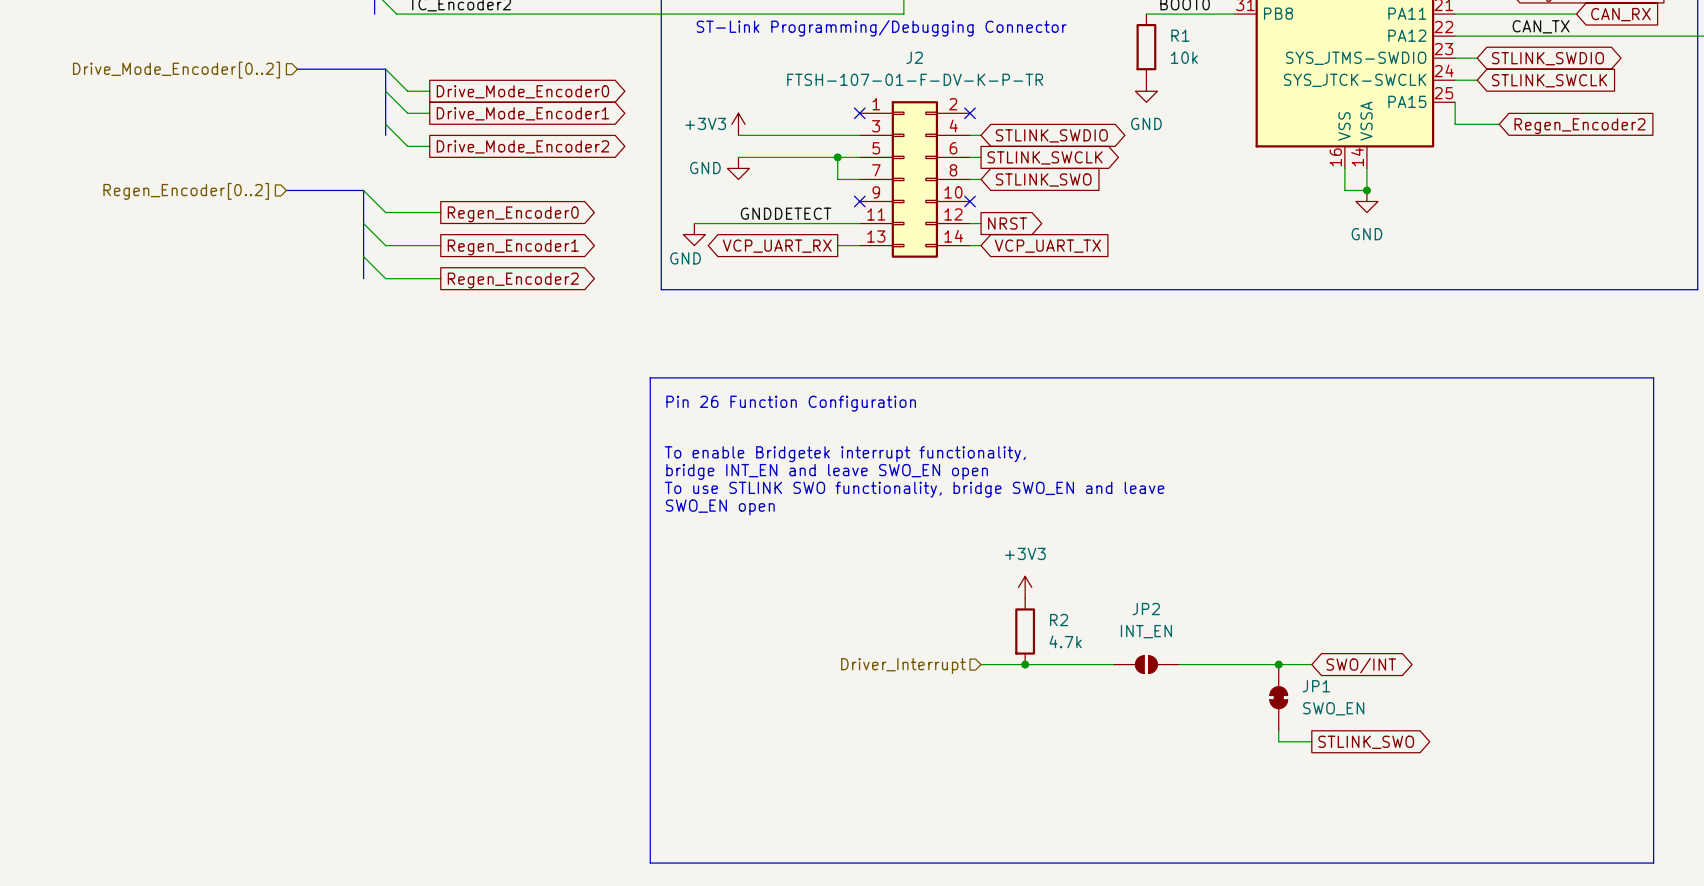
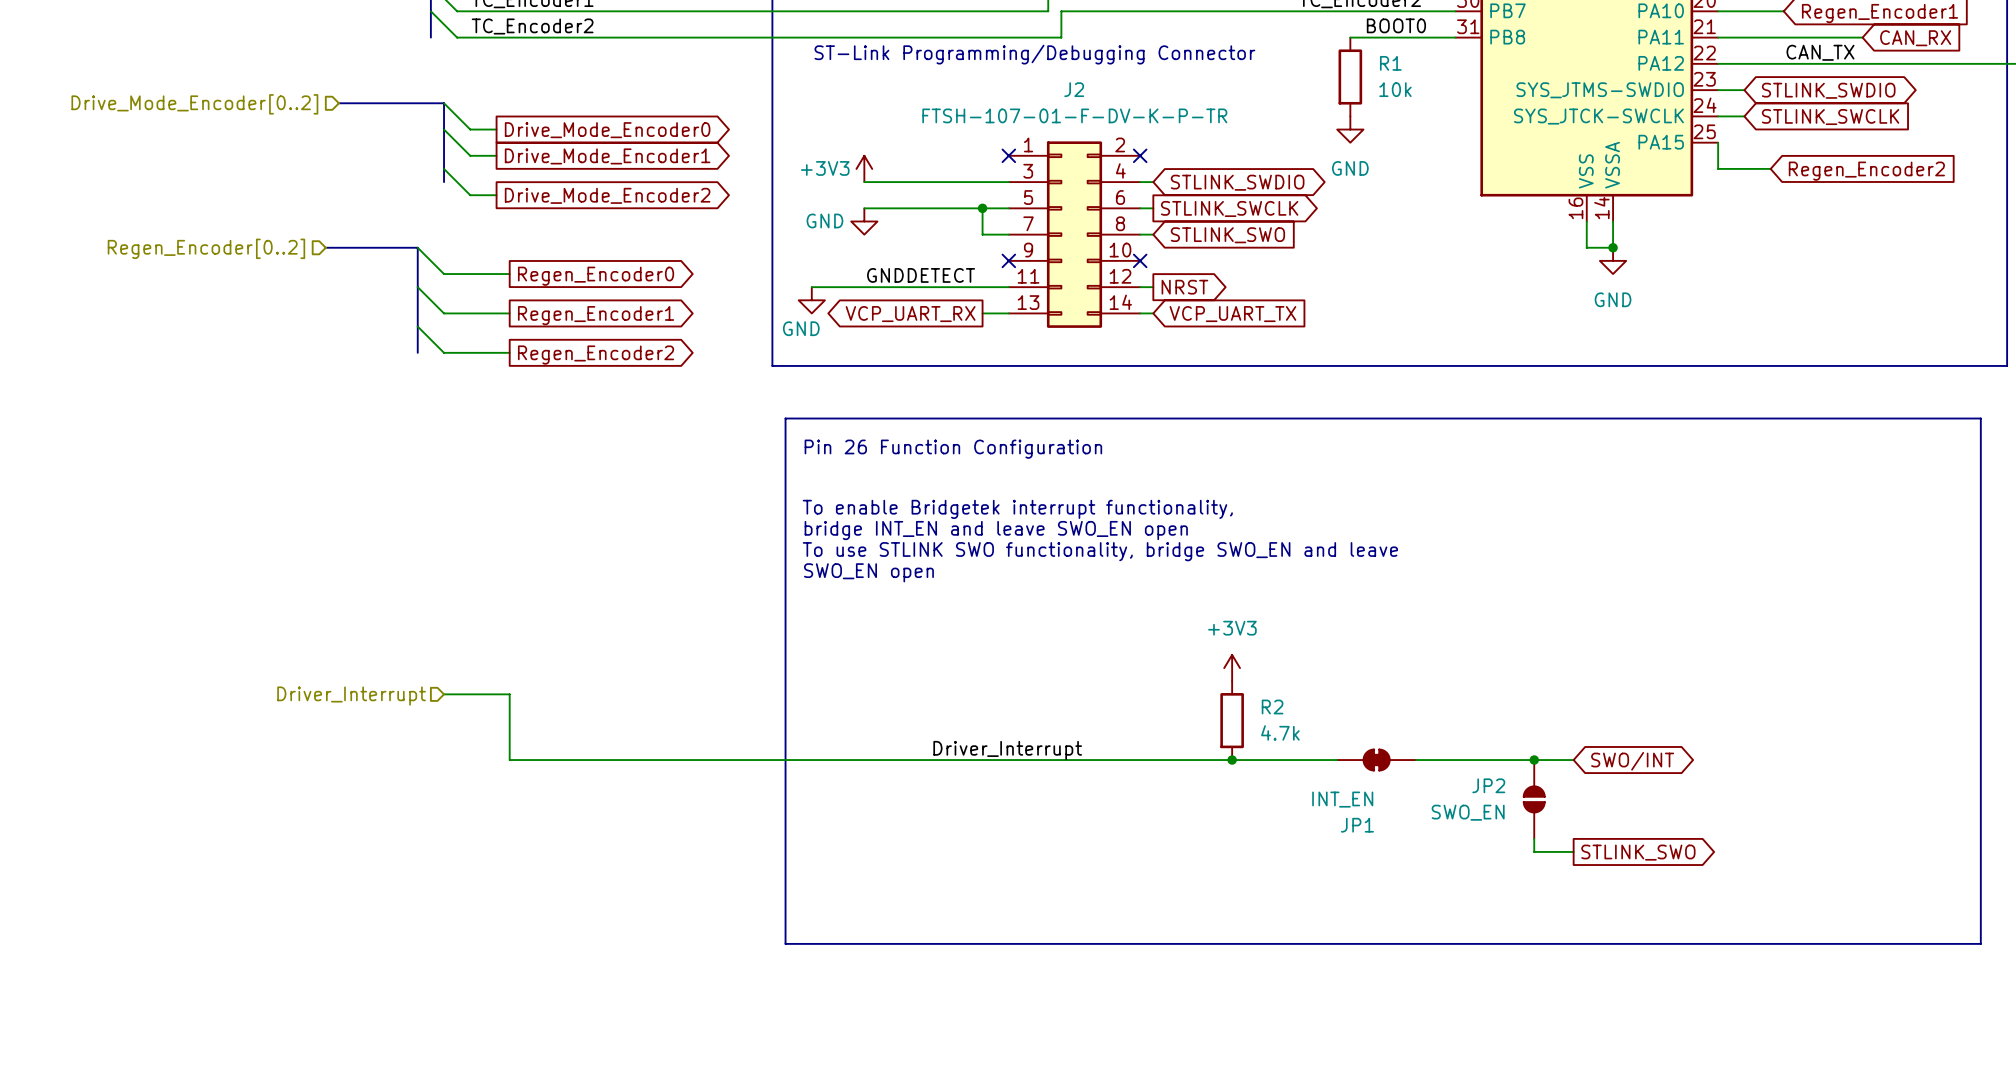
line: (650, 377) (1653, 377) (1653, 863) (650, 863) (650, 377) -> (785, 418) (785, 943) (1980, 943) (1980, 418) (785, 418)
text position: Pin 26 Function Configuration (791, 403) -> Pin 26 Function Configuration (953, 449)
text position: To enable Bridgetek interrupt functionality, (845, 454) -> To enable Bridgetek interrupt functionality, (1017, 509)
text position: bridge INT_EN and leave SWO_EN open (827, 471) -> bridge INT_EN and leave SWO_EN open (996, 530)
text position: To use STLINK SWO functionality, bridge SWO_EN and leave (914, 489) -> To use STLINK SWO functionality, bridge SWO_EN and leave (1100, 551)
text position: SWO_EN open (720, 507) -> SWO_EN open (868, 572)
wire: none -> (444, 694) (509, 694) (509, 760) (1337, 760)
hierarchical label: none -> Driver_Interrupt (351, 696)
power symbol position: +3V3 (1025, 587) -> +3V3 (1232, 668)
JP2 name position: JP2 (1146, 609) -> JP2 (1488, 785)
label: none -> Driver_Interrupt (1007, 750)
R2 position: (1025, 631) -> (1232, 720)
JP2 value: INT_EN (1146, 631) -> SWO_EN (1468, 812)
wire: (981, 664) (1113, 664) -> none
junction position: (1025, 664) -> (1232, 760)
JP2 rotation: 0° (1146, 664) -> 90° clockwise (1534, 799)
JP2 position: (1146, 664) -> (1534, 799)
wire: (1179, 664) (1311, 664) -> (1416, 760) (1573, 760)
junction position: (1278, 664) -> (1534, 760)
global label position: SWO/INT (1361, 665) -> SWO/INT (1632, 761)
hierarchical label: Driver_Interrupt (903, 666) -> none
JP1 name position: JP1 (1316, 686) -> JP1 (1357, 825)
JP1 rotation: 0° (1278, 697) -> 90° clockwise (1376, 760)
JP1 position: (1278, 697) -> (1376, 760)
JP1 value: SWO_EN (1333, 708) -> INT_EN (1342, 799)
wire: (1278, 730) (1278, 741) (1311, 741) -> (1534, 838) (1534, 851) (1573, 851)
global label position: STLINK_SWO (1366, 742) -> STLINK_SWO (1638, 852)

